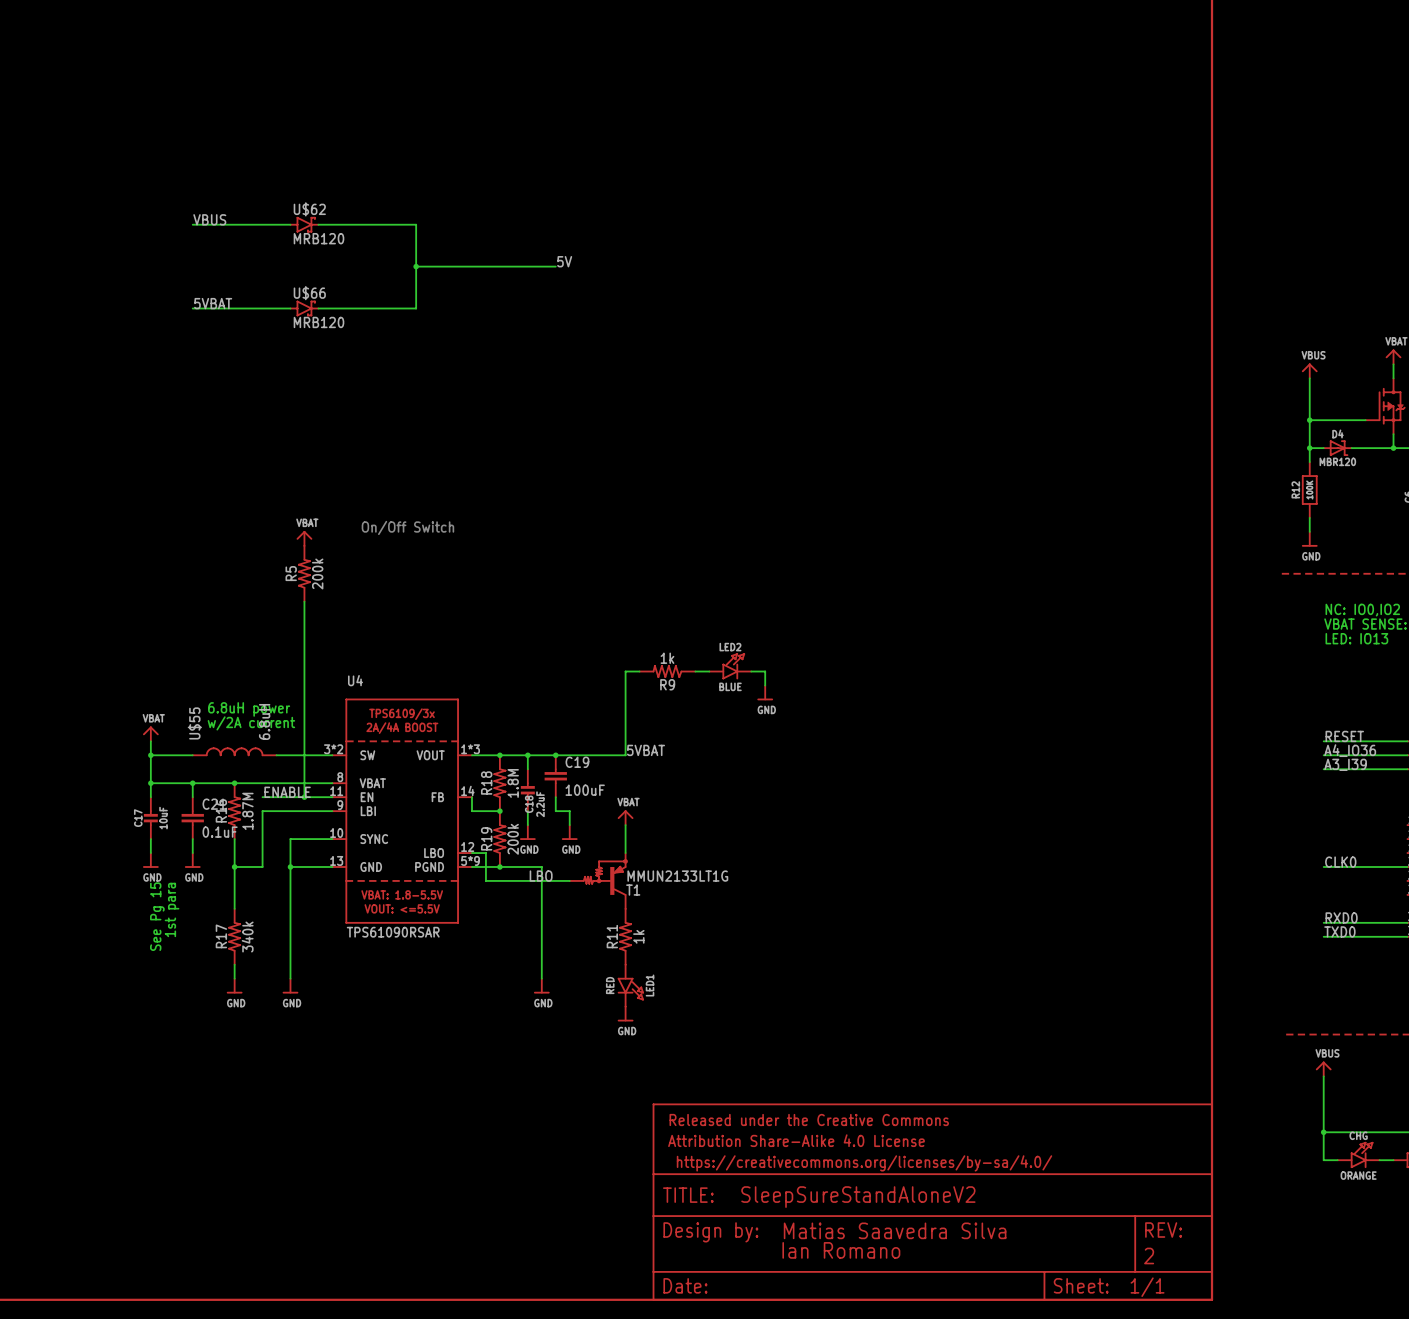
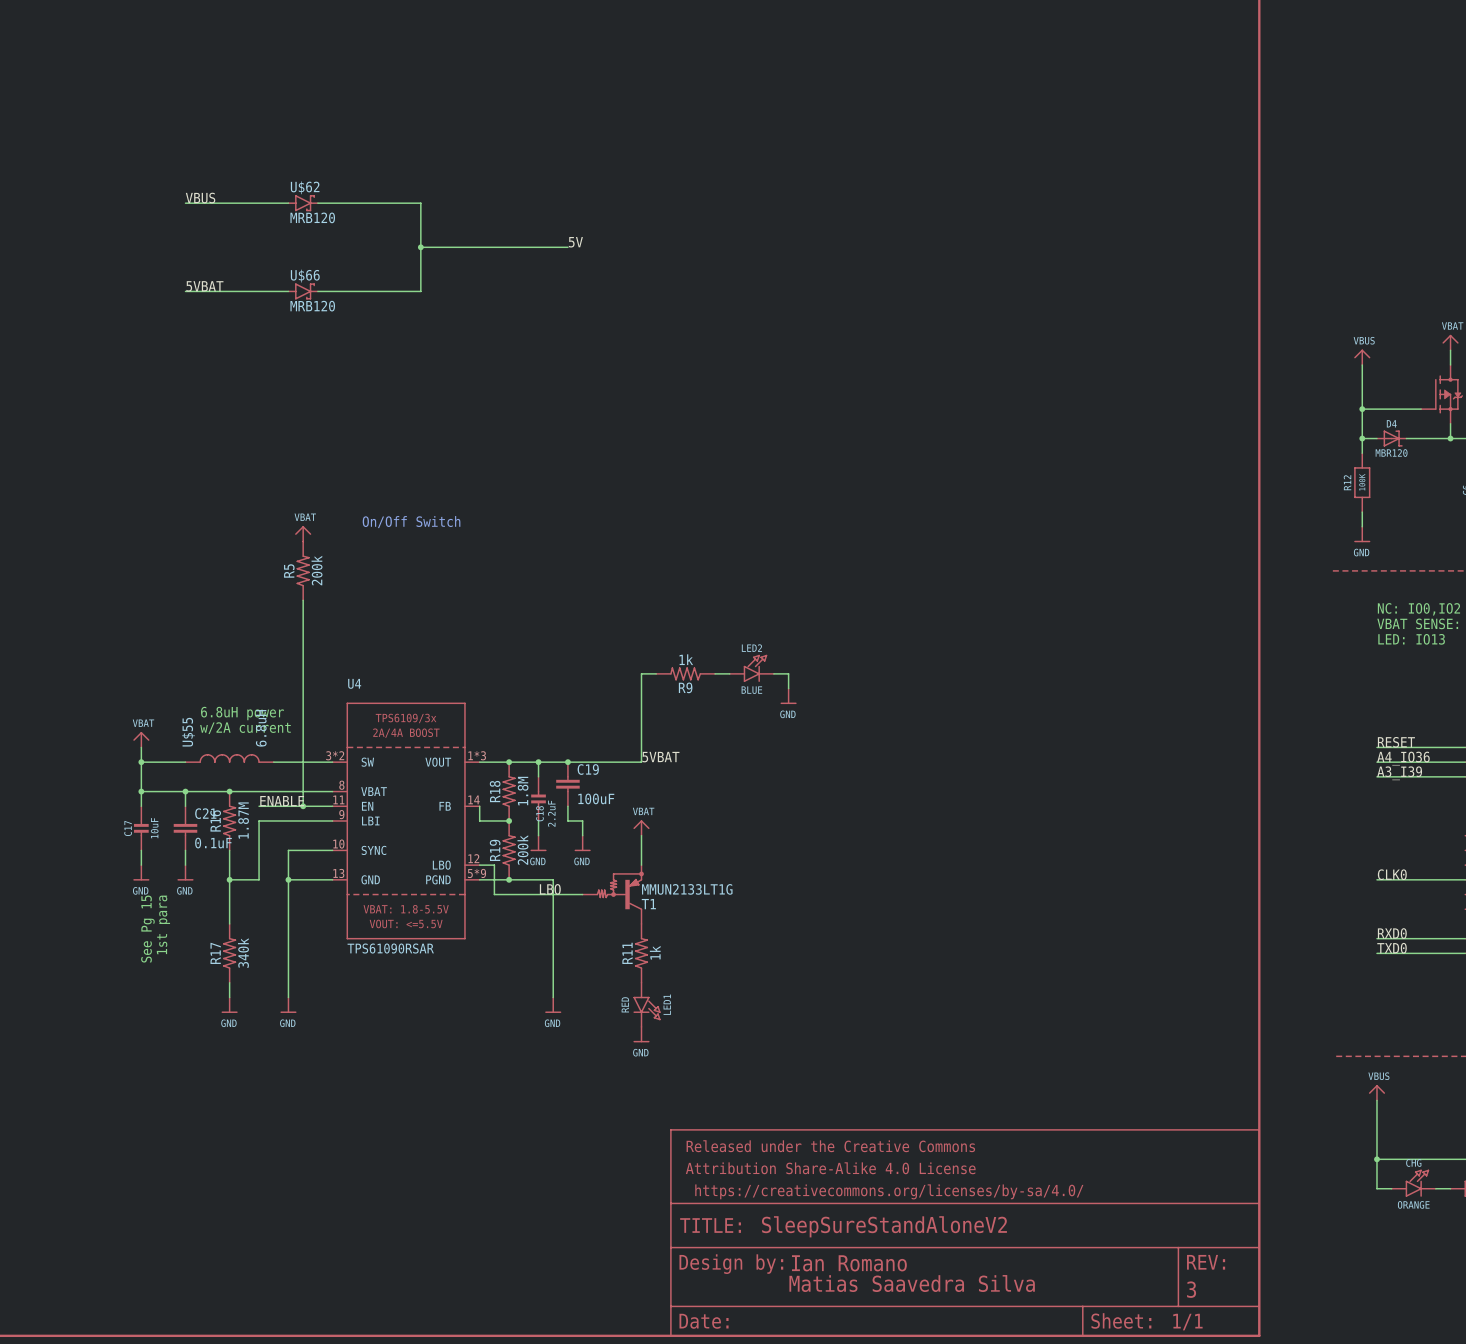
part text: Matias Saavedra Silva (895, 1230) -> Ian Romano (849, 1263)
part text: Ian Romano (841, 1250) -> Matias Saavedra Silva (912, 1283)
part text: 2 (1149, 1255) -> 3 (1191, 1289)

